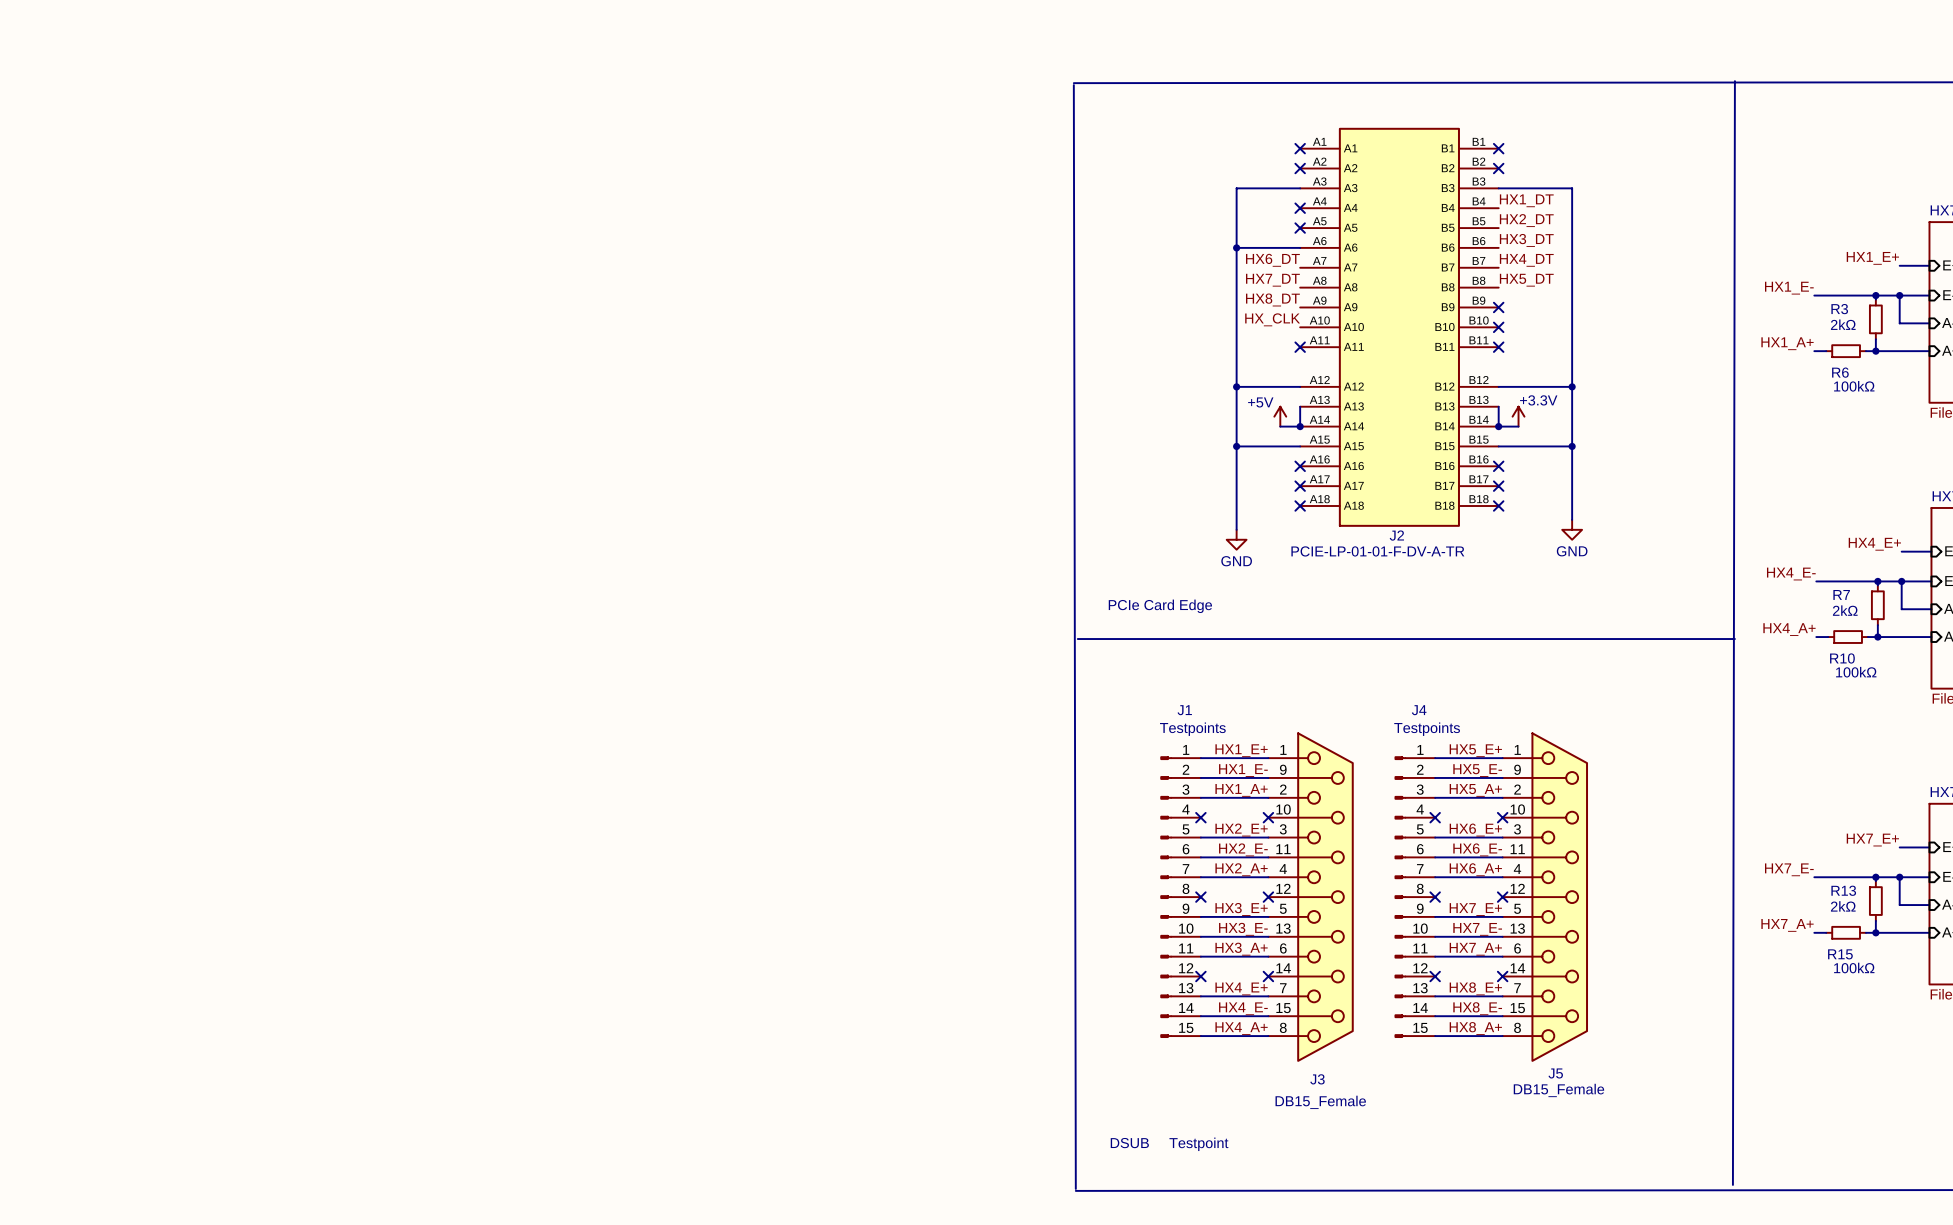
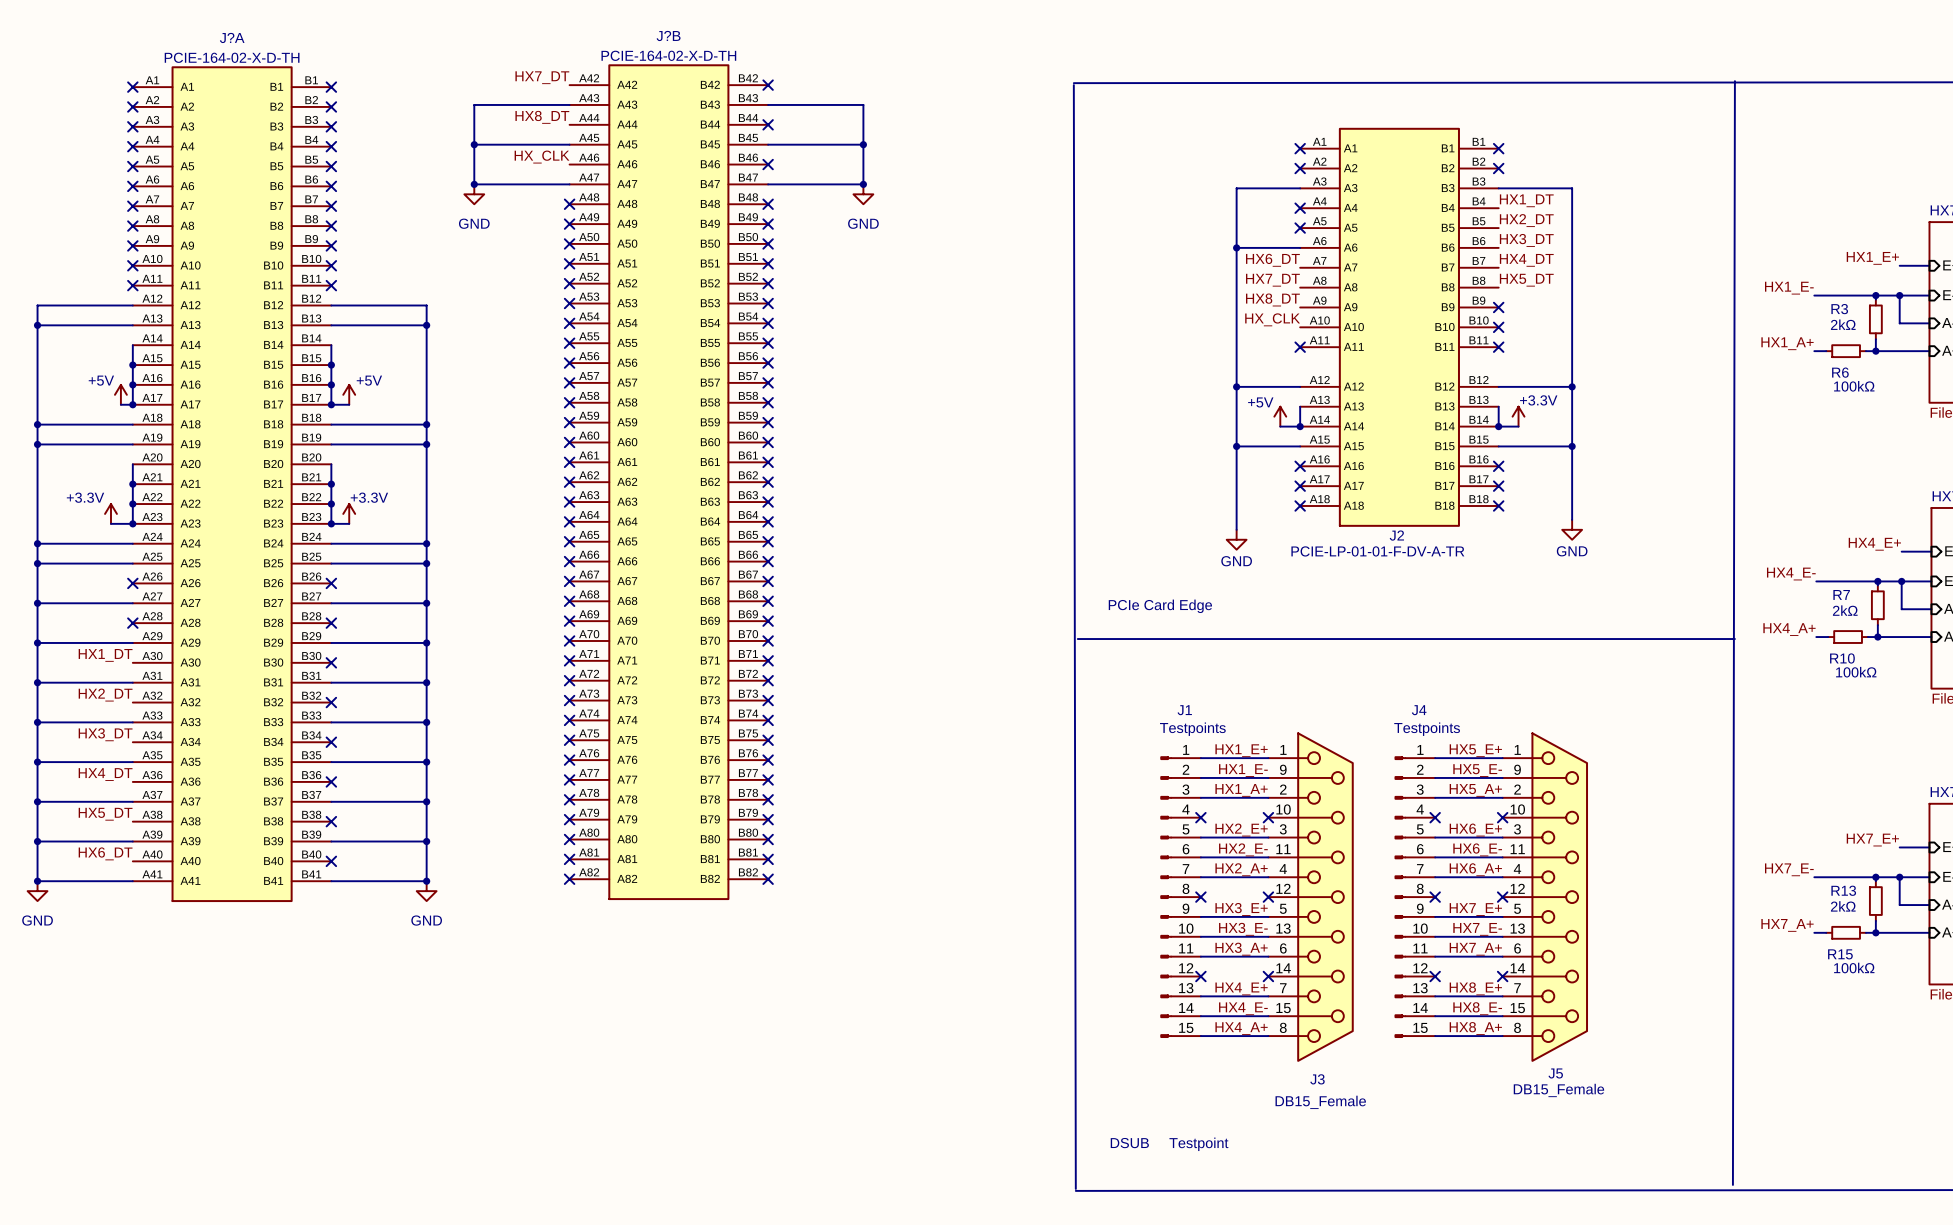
label: none -> HX7_DT (542, 77)
no-connect mark: none -> (768, 85)
no-connect mark: none -> (132, 87)
no-connect mark: none -> (331, 87)
wire: none -> (569, 104) (474, 104) (474, 184) (569, 184)
wire: none -> (768, 104) (863, 104) (863, 184) (768, 184)
no-connect mark: none -> (132, 106)
no-connect mark: none -> (331, 106)
label: none -> HX8_DT (542, 117)
no-connect mark: none -> (768, 124)
no-connect mark: none -> (132, 126)
no-connect mark: none -> (331, 126)
wire: none -> (474, 144) (569, 144)
junction: none -> (474, 144)
wire: none -> (768, 144) (863, 144)
junction: none -> (863, 144)
no-connect mark: none -> (132, 146)
no-connect mark: none -> (331, 146)
label: none -> HX_CLK (542, 157)
no-connect mark: none -> (768, 164)
no-connect mark: none -> (132, 166)
no-connect mark: none -> (331, 166)
junction: none -> (474, 184)
junction: none -> (863, 184)
no-connect mark: none -> (132, 186)
no-connect mark: none -> (331, 186)
power symbol: none -> GND (474, 194)
power symbol: none -> GND (863, 194)
no-connect mark: none -> (569, 204)
no-connect mark: none -> (768, 204)
no-connect mark: none -> (132, 206)
no-connect mark: none -> (331, 206)
no-connect mark: none -> (569, 224)
no-connect mark: none -> (768, 224)
no-connect mark: none -> (132, 226)
no-connect mark: none -> (331, 226)
no-connect mark: none -> (569, 243)
no-connect mark: none -> (768, 243)
no-connect mark: none -> (132, 245)
no-connect mark: none -> (331, 245)
no-connect mark: none -> (569, 263)
no-connect mark: none -> (768, 263)
no-connect mark: none -> (132, 265)
no-connect mark: none -> (331, 265)
no-connect mark: none -> (569, 283)
no-connect mark: none -> (768, 283)
no-connect mark: none -> (132, 285)
no-connect mark: none -> (331, 285)
no-connect mark: none -> (569, 303)
no-connect mark: none -> (768, 303)
wire: none -> (132, 305) (37, 305) (37, 881) (132, 881)
wire: none -> (331, 305) (426, 305) (426, 881) (331, 881)
no-connect mark: none -> (569, 323)
no-connect mark: none -> (768, 323)
wire: none -> (37, 325) (132, 325)
junction: none -> (37, 325)
wire: none -> (331, 325) (426, 325)
junction: none -> (426, 325)
no-connect mark: none -> (569, 343)
no-connect mark: none -> (768, 343)
wire: none -> (132, 345) (132, 404) (120, 404)
wire: none -> (331, 345) (331, 404) (349, 404)
no-connect mark: none -> (569, 363)
no-connect mark: none -> (768, 363)
junction: none -> (132, 365)
junction: none -> (331, 365)
no-connect mark: none -> (569, 382)
no-connect mark: none -> (768, 382)
junction: none -> (132, 384)
junction: none -> (331, 384)
power symbol: none -> +5V (120, 394)
power symbol: none -> +5V (349, 394)
no-connect mark: none -> (569, 402)
no-connect mark: none -> (768, 402)
junction: none -> (132, 404)
junction: none -> (331, 404)
no-connect mark: none -> (569, 422)
no-connect mark: none -> (768, 422)
wire: none -> (37, 424) (132, 424)
junction: none -> (37, 424)
wire: none -> (331, 424) (426, 424)
junction: none -> (426, 424)
no-connect mark: none -> (569, 442)
no-connect mark: none -> (768, 442)
wire: none -> (37, 444) (132, 444)
junction: none -> (37, 444)
wire: none -> (331, 444) (426, 444)
junction: none -> (426, 444)
no-connect mark: none -> (569, 462)
no-connect mark: none -> (768, 462)
wire: none -> (132, 464) (132, 523) (110, 523)
wire: none -> (331, 464) (331, 523) (349, 523)
no-connect mark: none -> (569, 482)
J?B: none -> PCIE-164-02-X-D-TH (668, 482)
no-connect mark: none -> (768, 482)
junction: none -> (132, 484)
J?A: none -> PCIE-164-02-X-D-TH (232, 484)
junction: none -> (331, 484)
no-connect mark: none -> (569, 502)
no-connect mark: none -> (768, 502)
junction: none -> (132, 504)
junction: none -> (331, 504)
power symbol: none -> +3.3V (110, 513)
power symbol: none -> +3.3V (349, 513)
no-connect mark: none -> (569, 521)
no-connect mark: none -> (768, 521)
junction: none -> (132, 523)
junction: none -> (331, 523)
no-connect mark: none -> (569, 541)
no-connect mark: none -> (768, 541)
wire: none -> (37, 543) (132, 543)
junction: none -> (37, 543)
wire: none -> (331, 543) (426, 543)
junction: none -> (426, 543)
no-connect mark: none -> (569, 561)
no-connect mark: none -> (768, 561)
wire: none -> (37, 563) (132, 563)
junction: none -> (37, 563)
wire: none -> (331, 563) (426, 563)
junction: none -> (426, 563)
no-connect mark: none -> (569, 581)
no-connect mark: none -> (768, 581)
no-connect mark: none -> (132, 583)
no-connect mark: none -> (331, 583)
no-connect mark: none -> (569, 601)
no-connect mark: none -> (768, 601)
wire: none -> (37, 603) (132, 603)
junction: none -> (37, 603)
wire: none -> (331, 603) (426, 603)
junction: none -> (426, 603)
no-connect mark: none -> (569, 621)
no-connect mark: none -> (768, 621)
no-connect mark: none -> (132, 623)
no-connect mark: none -> (331, 623)
no-connect mark: none -> (569, 641)
no-connect mark: none -> (768, 641)
wire: none -> (37, 642) (132, 642)
junction: none -> (37, 642)
wire: none -> (331, 642) (426, 642)
junction: none -> (426, 642)
label: none -> HX1_DT (105, 655)
no-connect mark: none -> (569, 660)
no-connect mark: none -> (768, 660)
no-connect mark: none -> (331, 662)
no-connect mark: none -> (569, 680)
no-connect mark: none -> (768, 680)
wire: none -> (37, 682) (132, 682)
junction: none -> (37, 682)
wire: none -> (331, 682) (426, 682)
junction: none -> (426, 682)
label: none -> HX2_DT (105, 695)
no-connect mark: none -> (569, 700)
no-connect mark: none -> (768, 700)
no-connect mark: none -> (331, 702)
no-connect mark: none -> (569, 720)
no-connect mark: none -> (768, 720)
wire: none -> (37, 722) (132, 722)
junction: none -> (37, 722)
wire: none -> (331, 722) (426, 722)
junction: none -> (426, 722)
label: none -> HX3_DT (105, 734)
no-connect mark: none -> (569, 740)
no-connect mark: none -> (768, 740)
no-connect mark: none -> (331, 742)
no-connect mark: none -> (569, 760)
no-connect mark: none -> (768, 760)
wire: none -> (37, 762) (132, 762)
junction: none -> (37, 762)
wire: none -> (331, 762) (426, 762)
junction: none -> (426, 762)
label: none -> HX4_DT (105, 774)
no-connect mark: none -> (569, 779)
no-connect mark: none -> (768, 779)
no-connect mark: none -> (331, 781)
no-connect mark: none -> (569, 799)
no-connect mark: none -> (768, 799)
wire: none -> (37, 801) (132, 801)
junction: none -> (37, 801)
wire: none -> (331, 801) (426, 801)
junction: none -> (426, 801)
label: none -> HX5_DT (105, 814)
no-connect mark: none -> (569, 819)
no-connect mark: none -> (768, 819)
no-connect mark: none -> (331, 821)
no-connect mark: none -> (569, 839)
no-connect mark: none -> (768, 839)
wire: none -> (37, 841) (132, 841)
junction: none -> (37, 841)
wire: none -> (331, 841) (426, 841)
junction: none -> (426, 841)
label: none -> HX6_DT (105, 853)
no-connect mark: none -> (569, 859)
no-connect mark: none -> (768, 859)
no-connect mark: none -> (331, 861)
no-connect mark: none -> (569, 879)
no-connect mark: none -> (768, 879)
junction: none -> (37, 881)
junction: none -> (426, 881)
power symbol: none -> GND (37, 891)
power symbol: none -> GND (426, 891)

